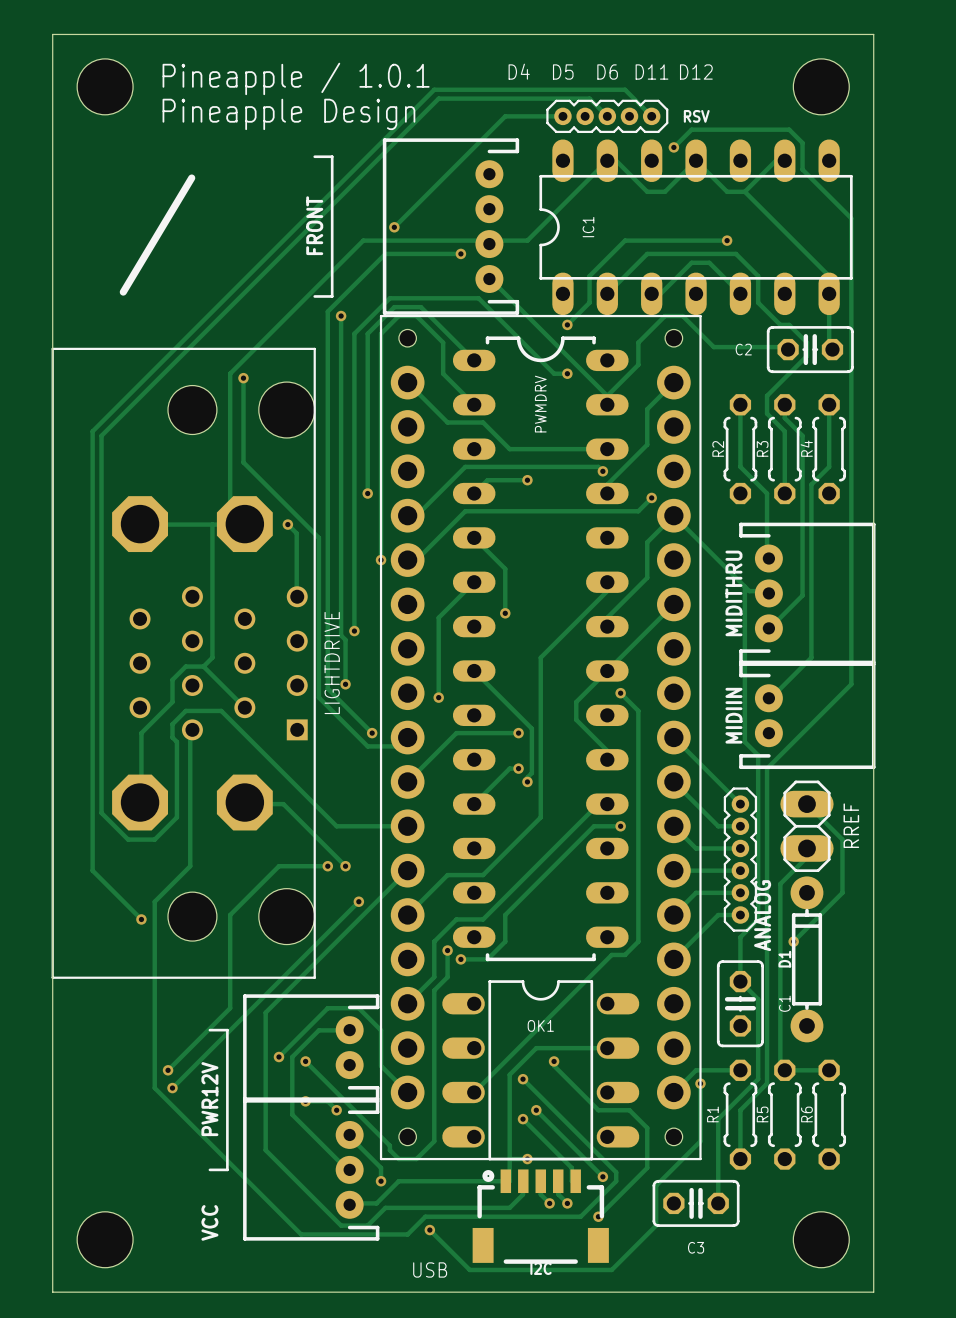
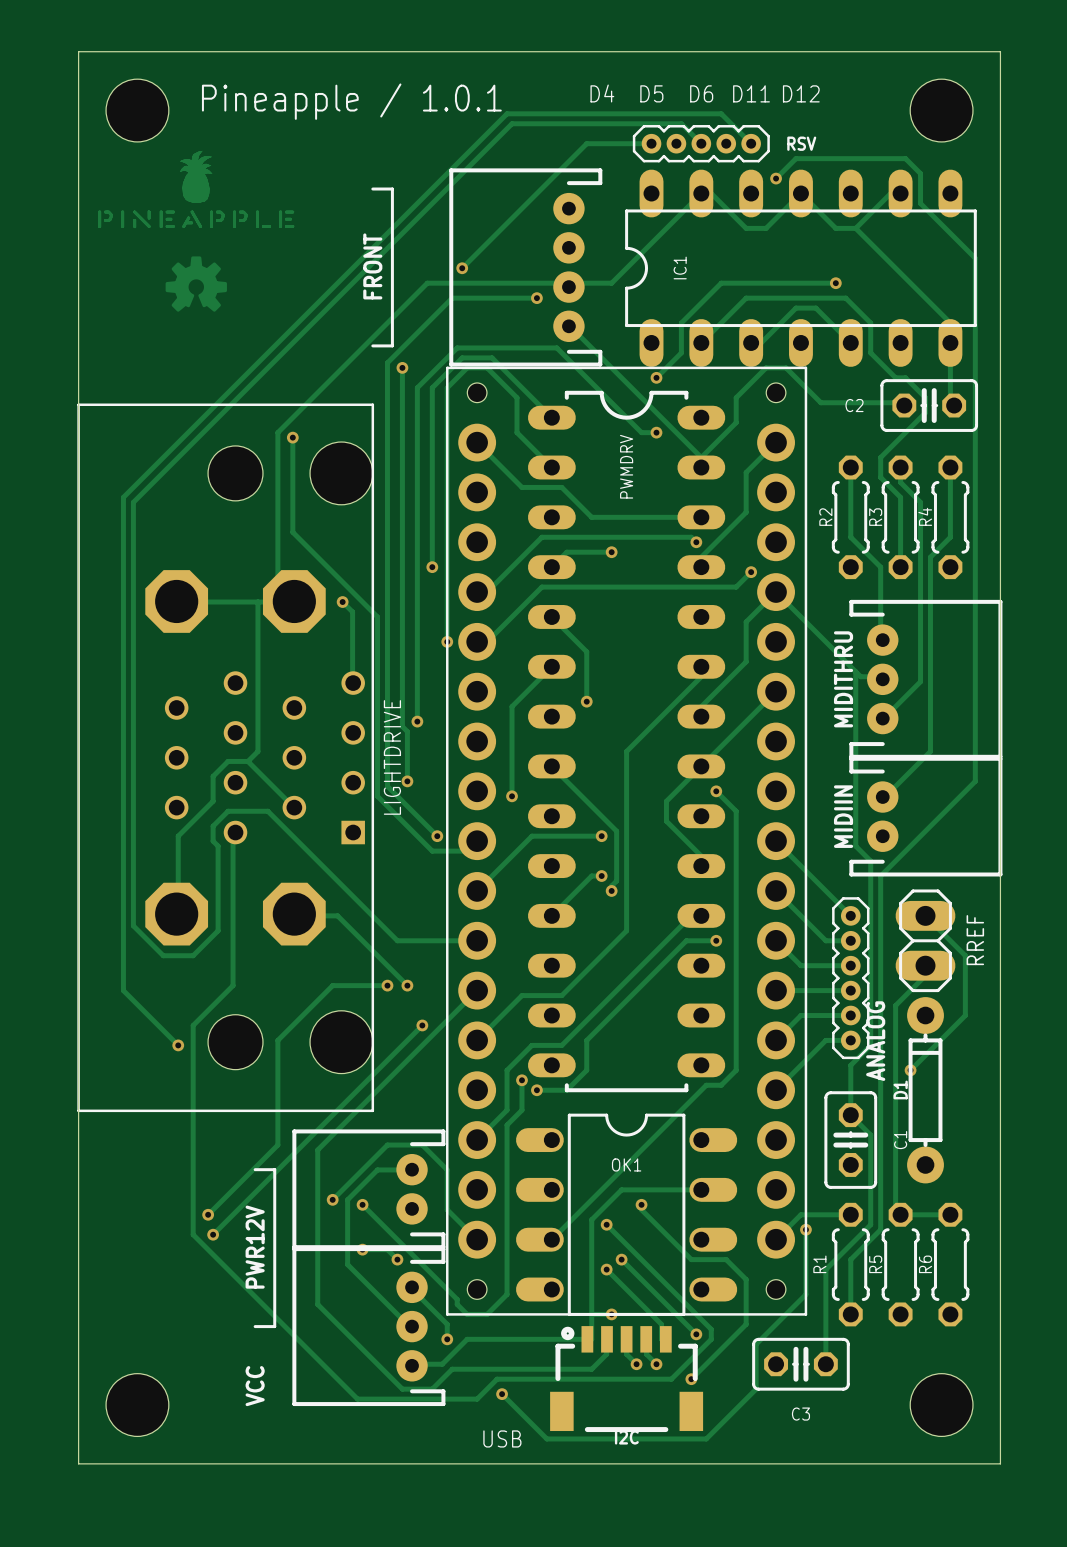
text: Pineapple Design (288, 114) -> none
drawing: none -> [98, 150, 295, 229]
drawing: none -> [165, 256, 227, 312]
text: / (157, 235) -> none

